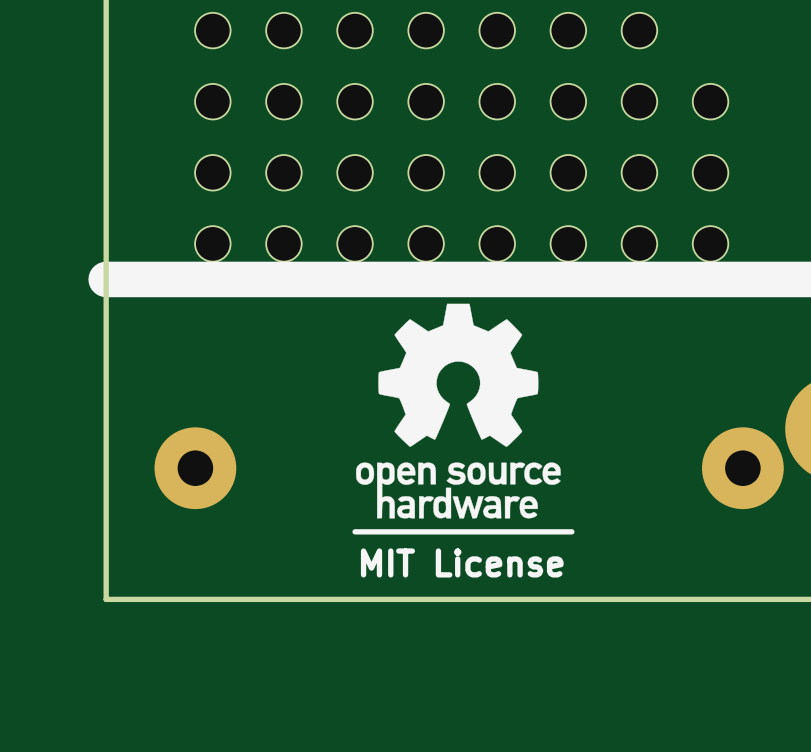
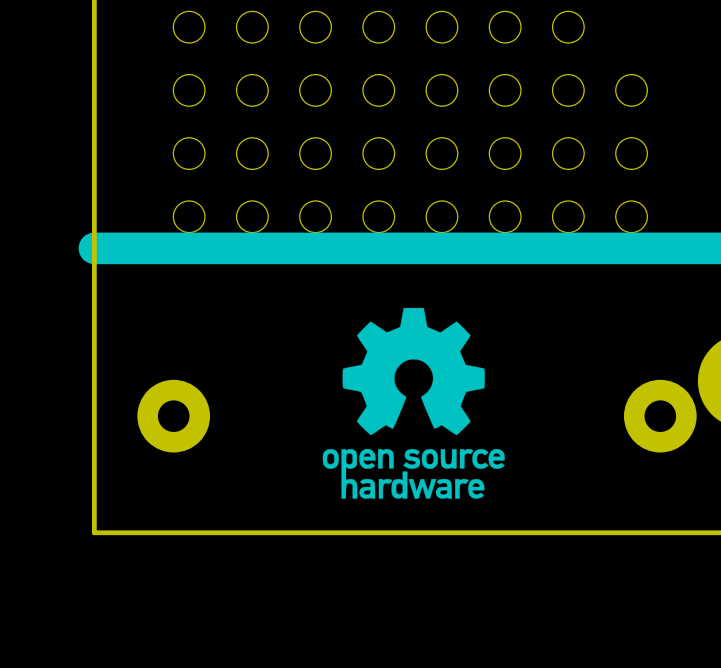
drawing position: (458, 411) -> (413, 403)
line: (571, 531) (355, 531) -> none
text: MIT License (462, 562) -> none

